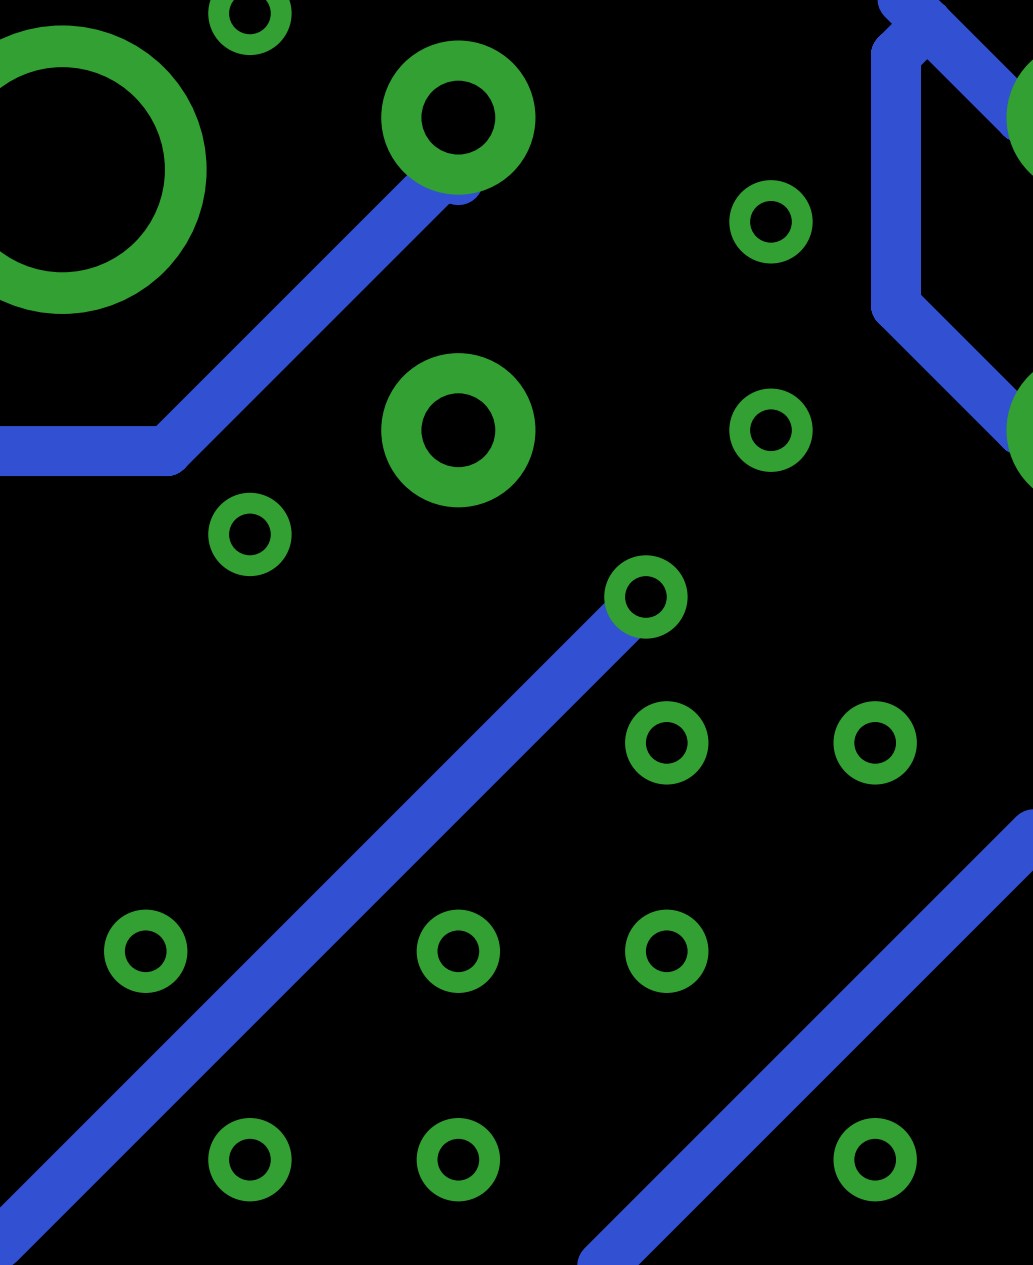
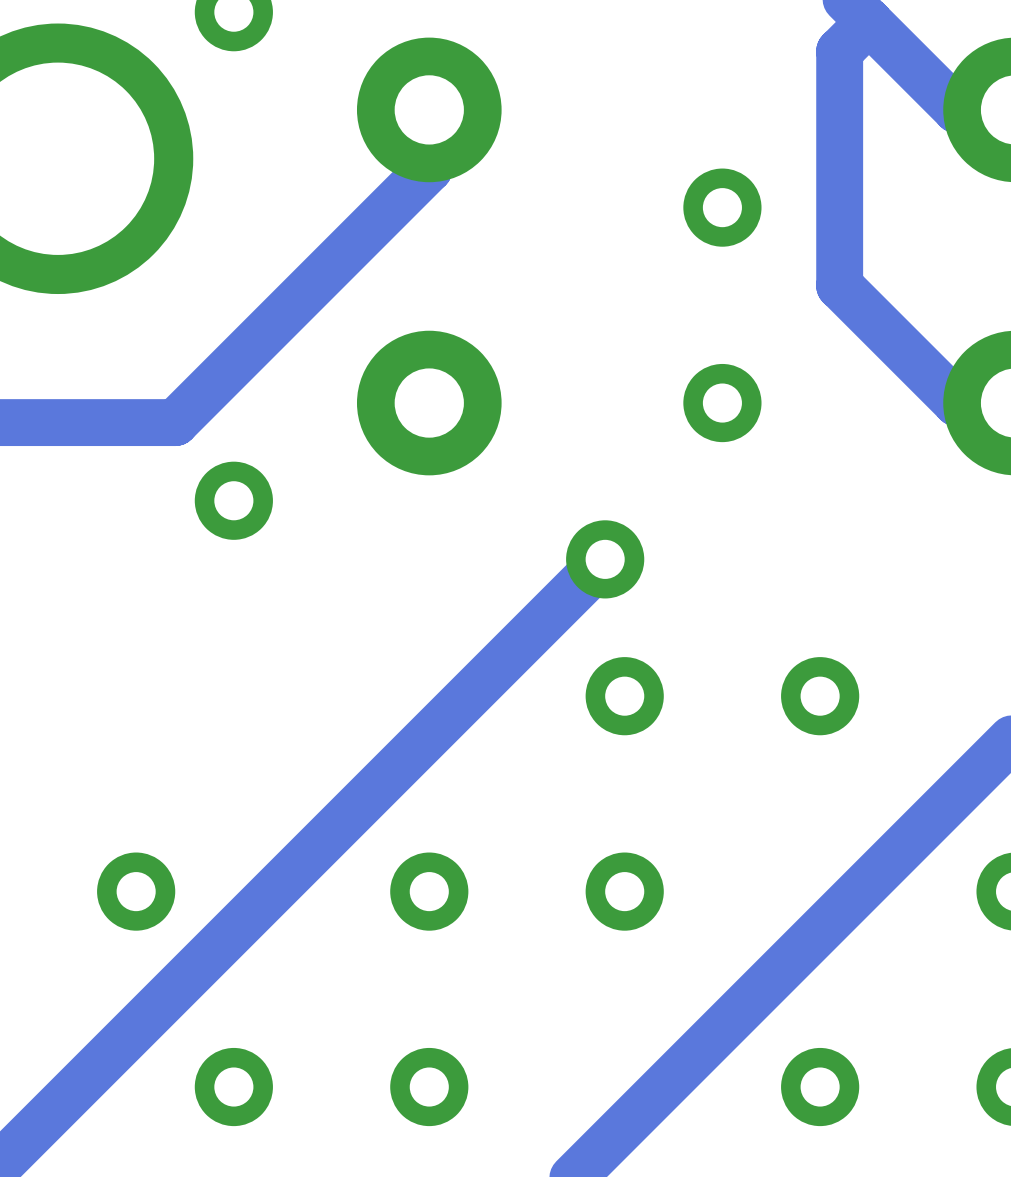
track: (458, 117) (437, 180) (166, 451) -> (429, 168) (175, 422) (155, 422)

